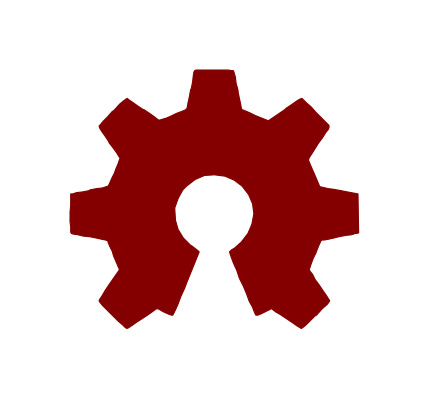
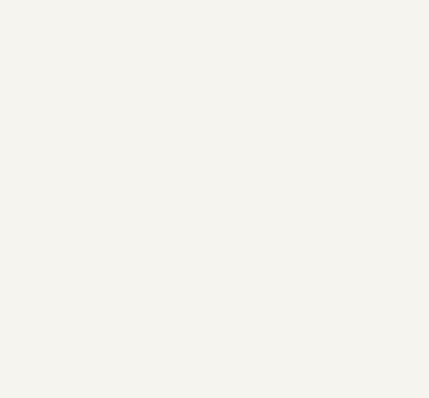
part: (214, 199) -> none

